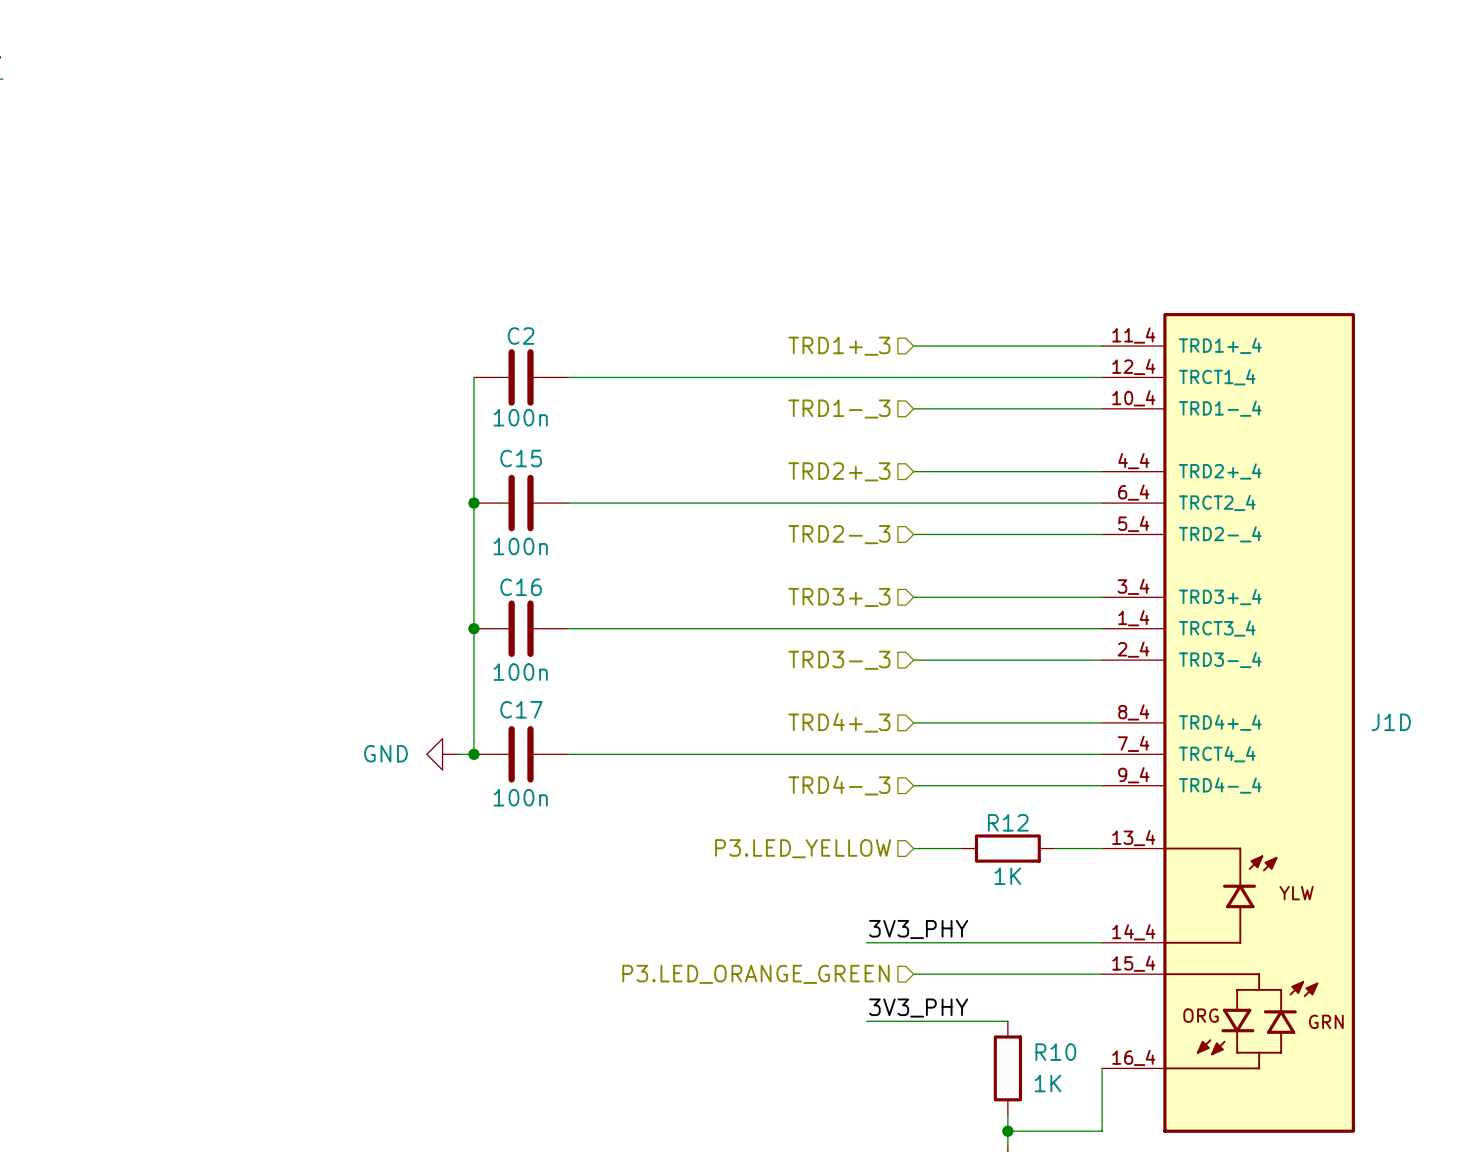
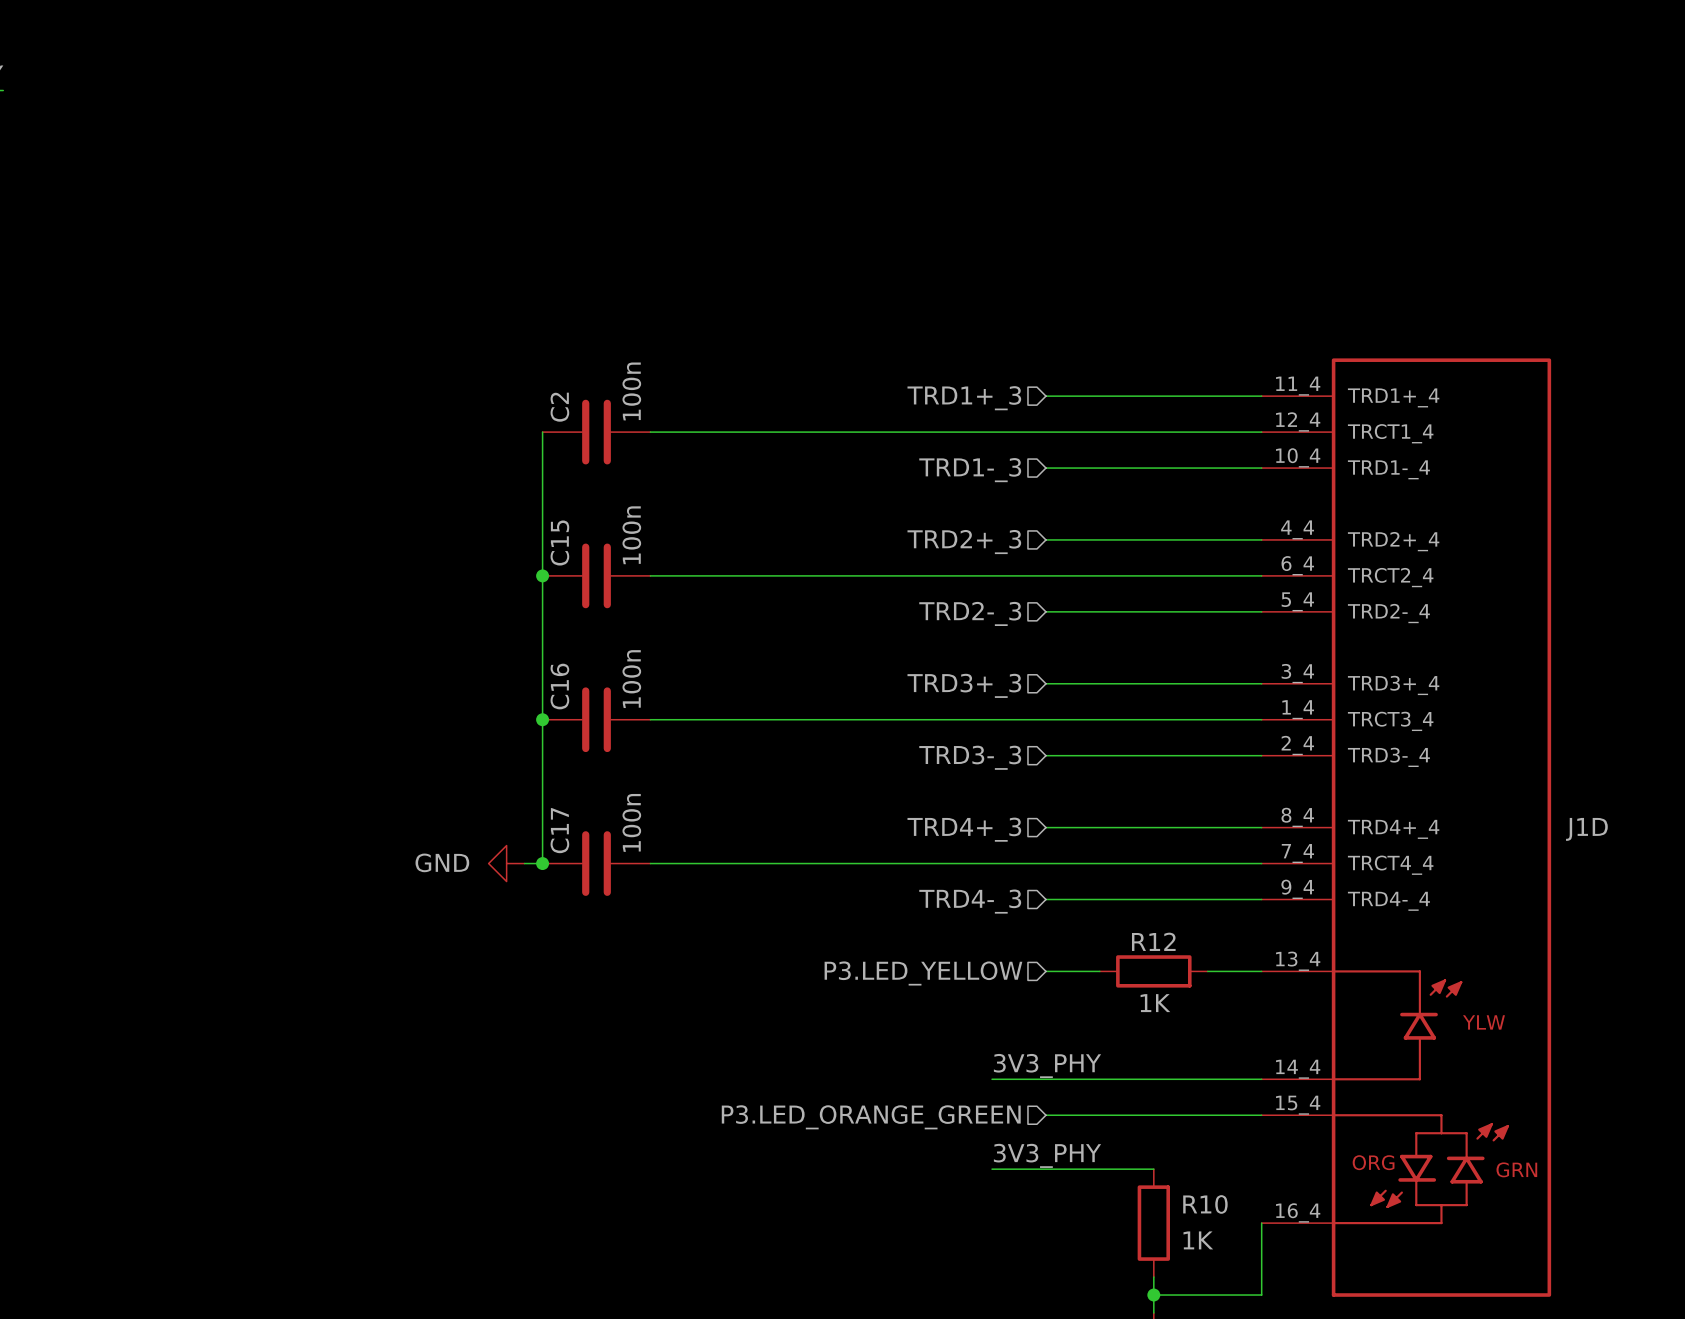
C2 name rotation: 0° (521, 336) -> 90° counterclockwise (559, 407)
C2 value rotation: 0° (520, 417) -> 90° counterclockwise (631, 391)
C2 value position: 100n (520, 417) -> 100n (631, 391)
C15 name rotation: 0° (521, 458) -> 90° counterclockwise (559, 543)
C15 value rotation: 0° (520, 546) -> 90° counterclockwise (631, 535)
C15 value position: 100n (520, 546) -> 100n (631, 535)
C16 name rotation: 0° (521, 587) -> 90° counterclockwise (559, 686)
C16 value rotation: 0° (520, 672) -> 90° counterclockwise (631, 679)
C16 value position: 100n (520, 672) -> 100n (631, 679)
C17 name rotation: 0° (521, 709) -> 90° counterclockwise (559, 830)
C17 value rotation: 0° (520, 797) -> 90° counterclockwise (631, 822)
C17 value position: 100n (520, 797) -> 100n (631, 822)

